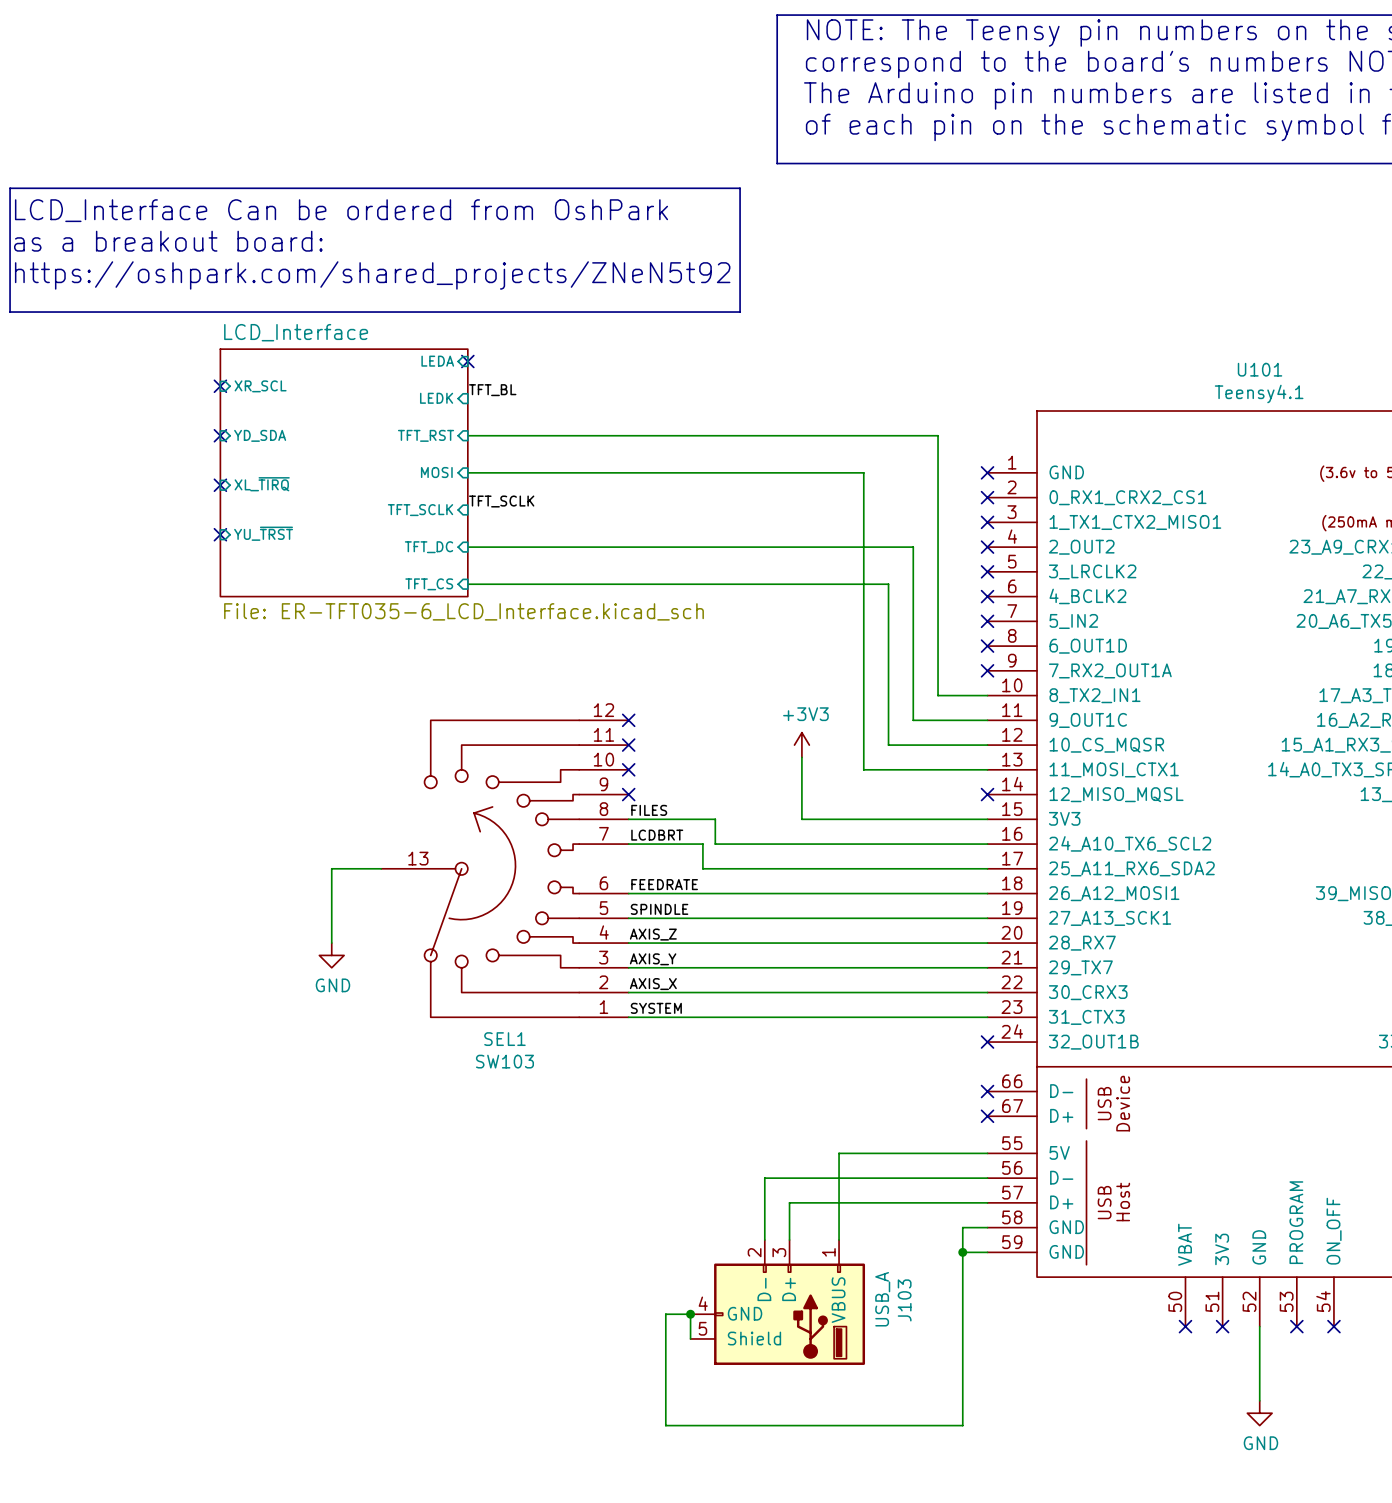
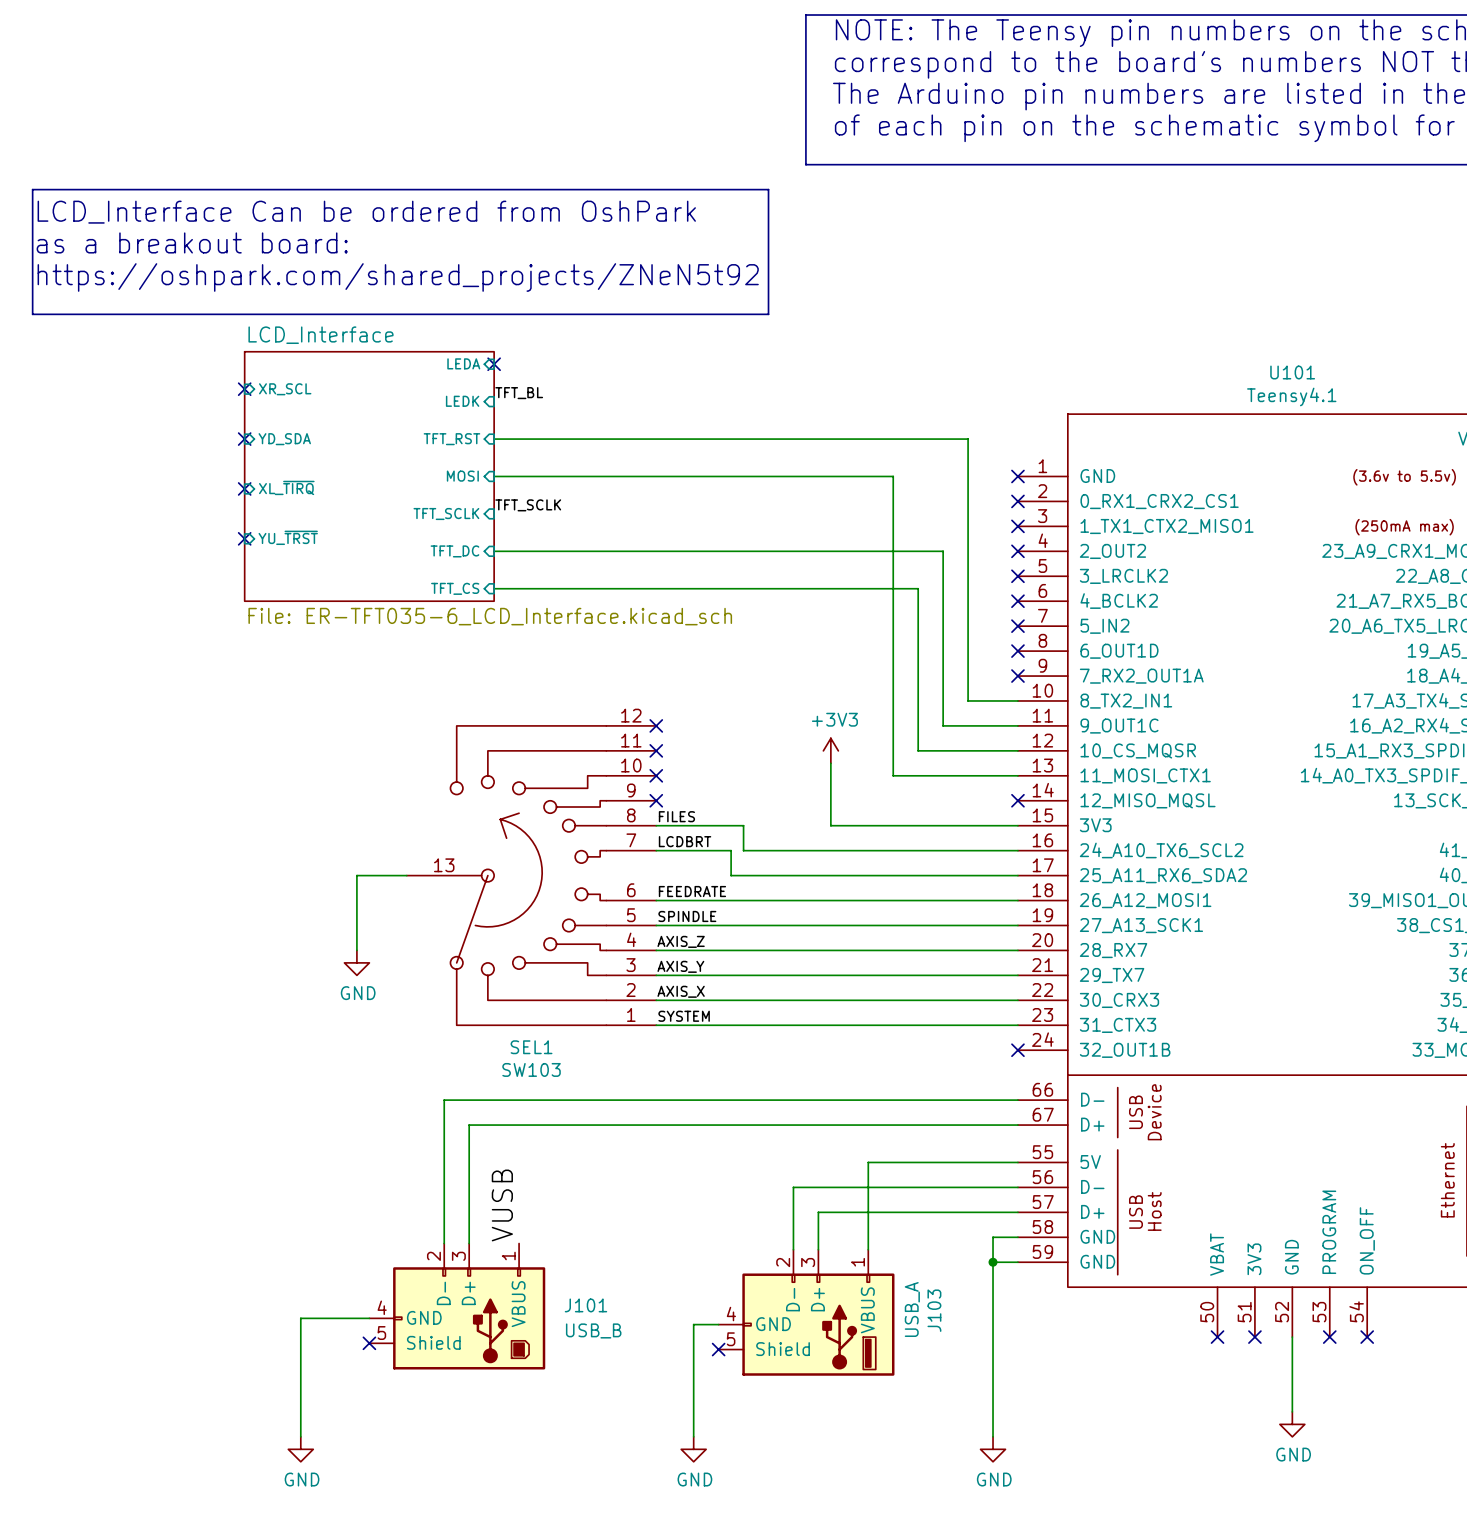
wire: none -> (1017, 1100) (444, 1100) (444, 1243)
no-connect mark: (987, 1091) -> none
wire: none -> (1017, 1125) (469, 1125) (469, 1243)
no-connect mark: (987, 1116) -> none
label: none -> VUSB (502, 1205)
J101: none -> USB_B (457, 1306)
wire: none -> (369, 1318) (300, 1318) (300, 1436)
wire: (690, 1314) (690, 1338) -> none
junction: (690, 1314) -> none
no-connect mark: none -> (369, 1343)
no-connect mark: none -> (718, 1349)
wire: (665, 1425) (962, 1425) -> none
power symbol: none -> GND (300, 1449)
power symbol: none -> GND (693, 1449)
power symbol: none -> GND (993, 1449)

